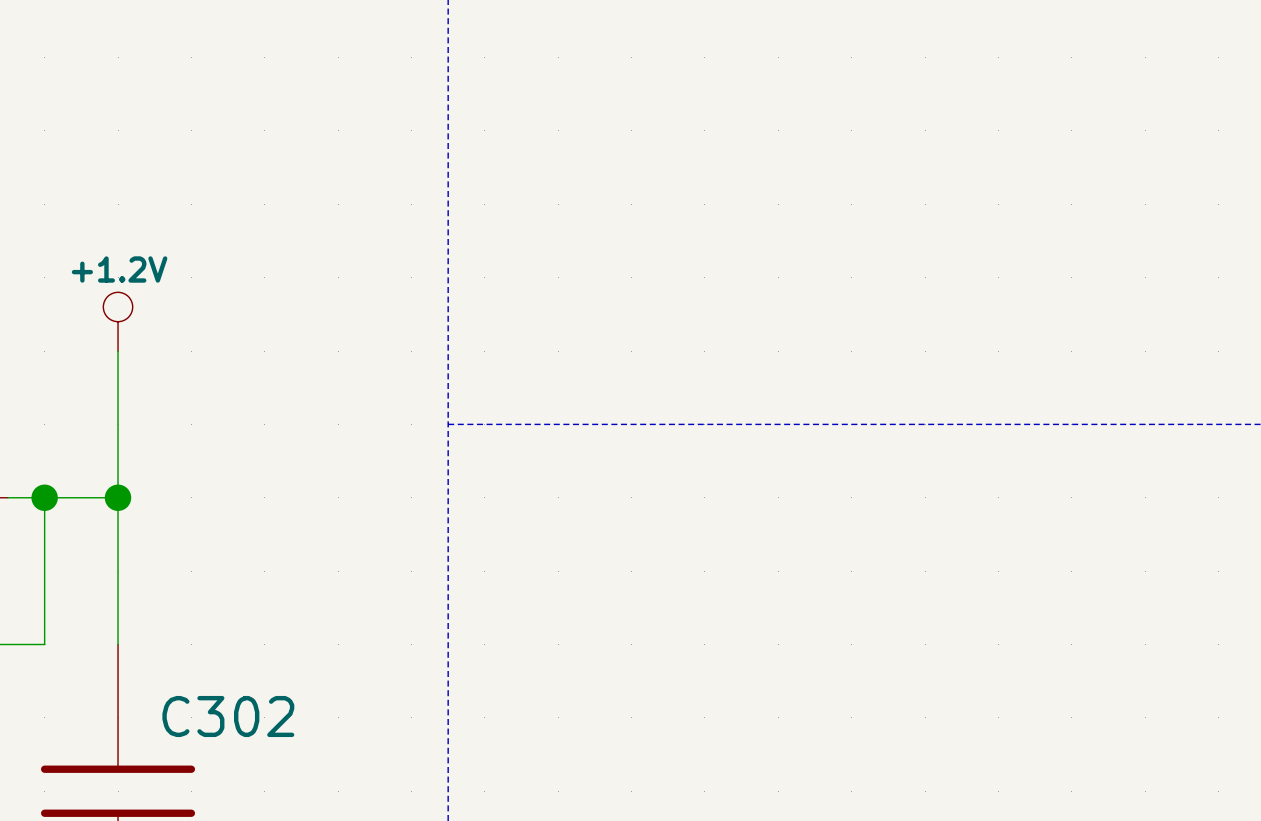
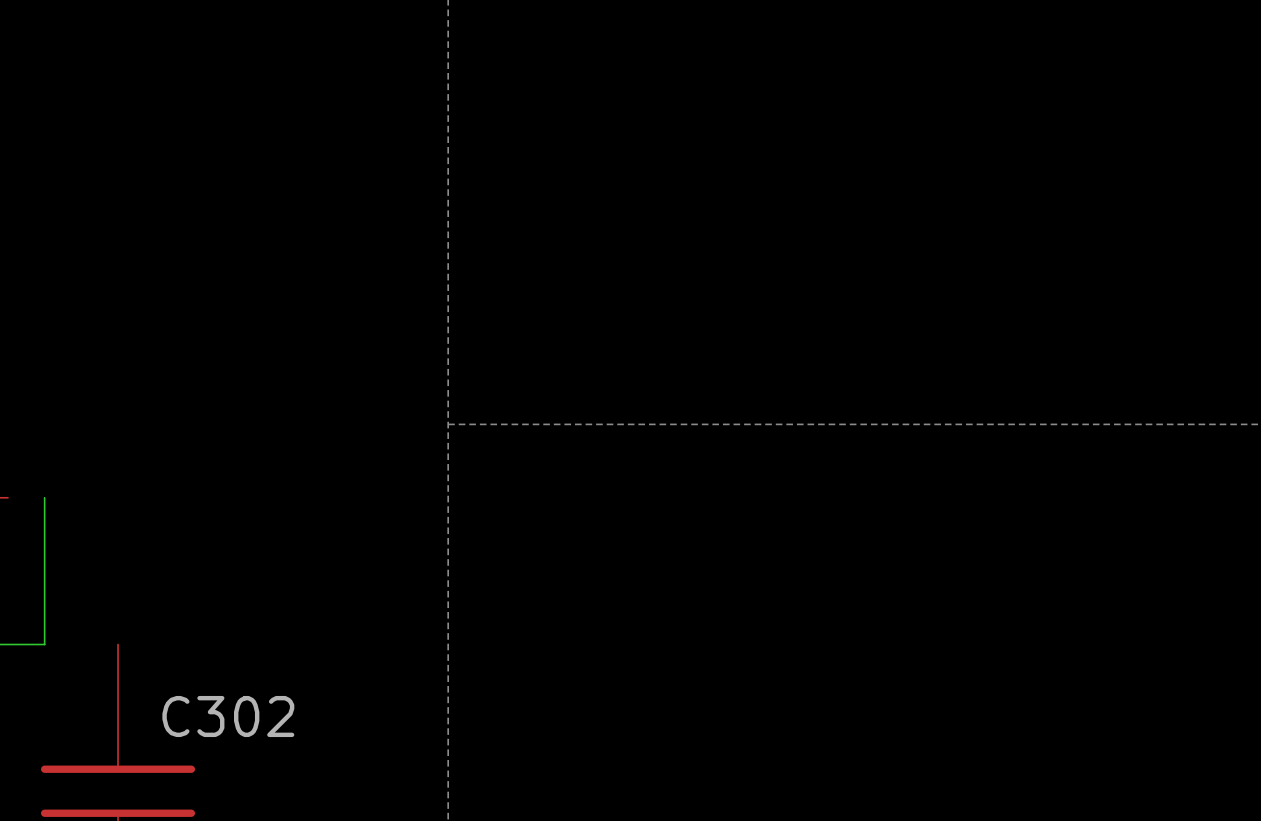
power symbol: +1.2V (118, 321) -> none
wire: (118, 351) (118, 644) -> none
wire: (7, 497) (118, 497) -> none
junction: (44, 497) -> none
junction: (118, 497) -> none

